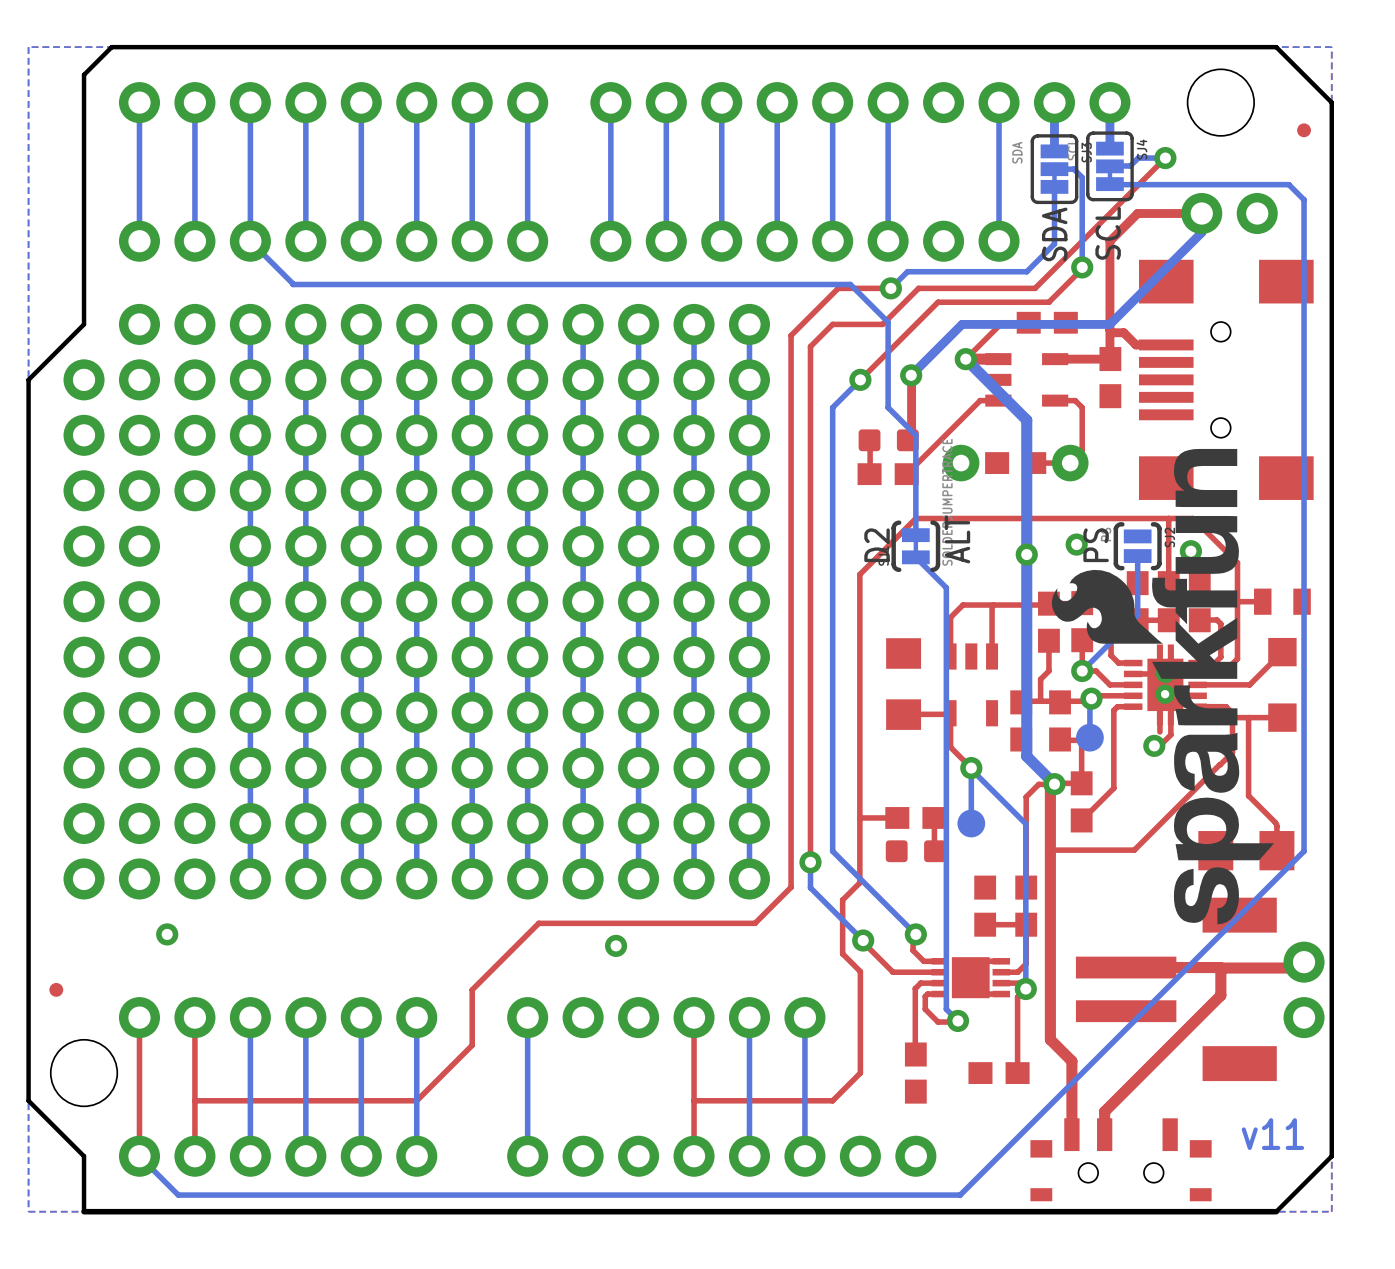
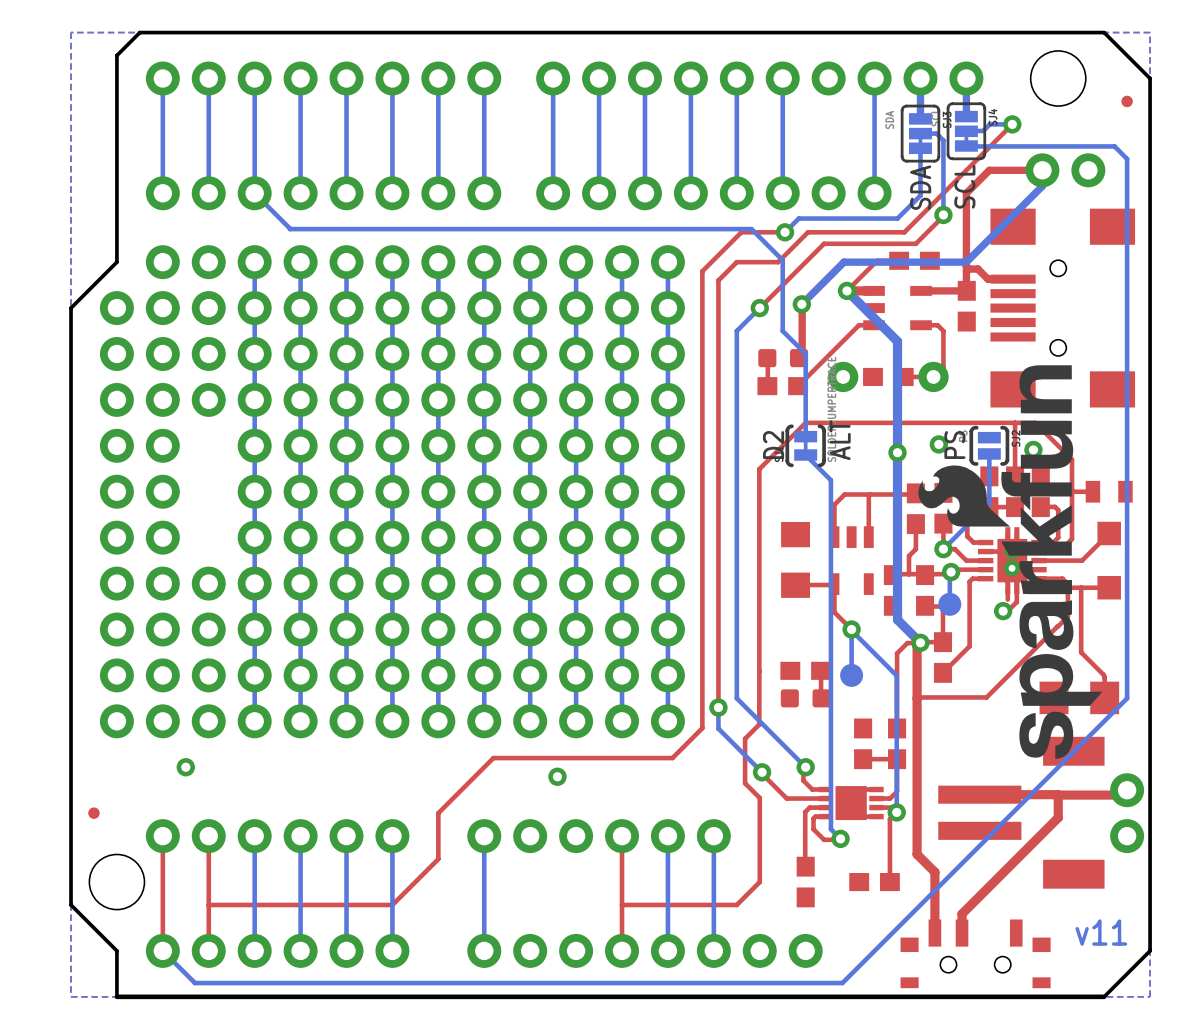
top track: (897, 817) (859, 817) -> none

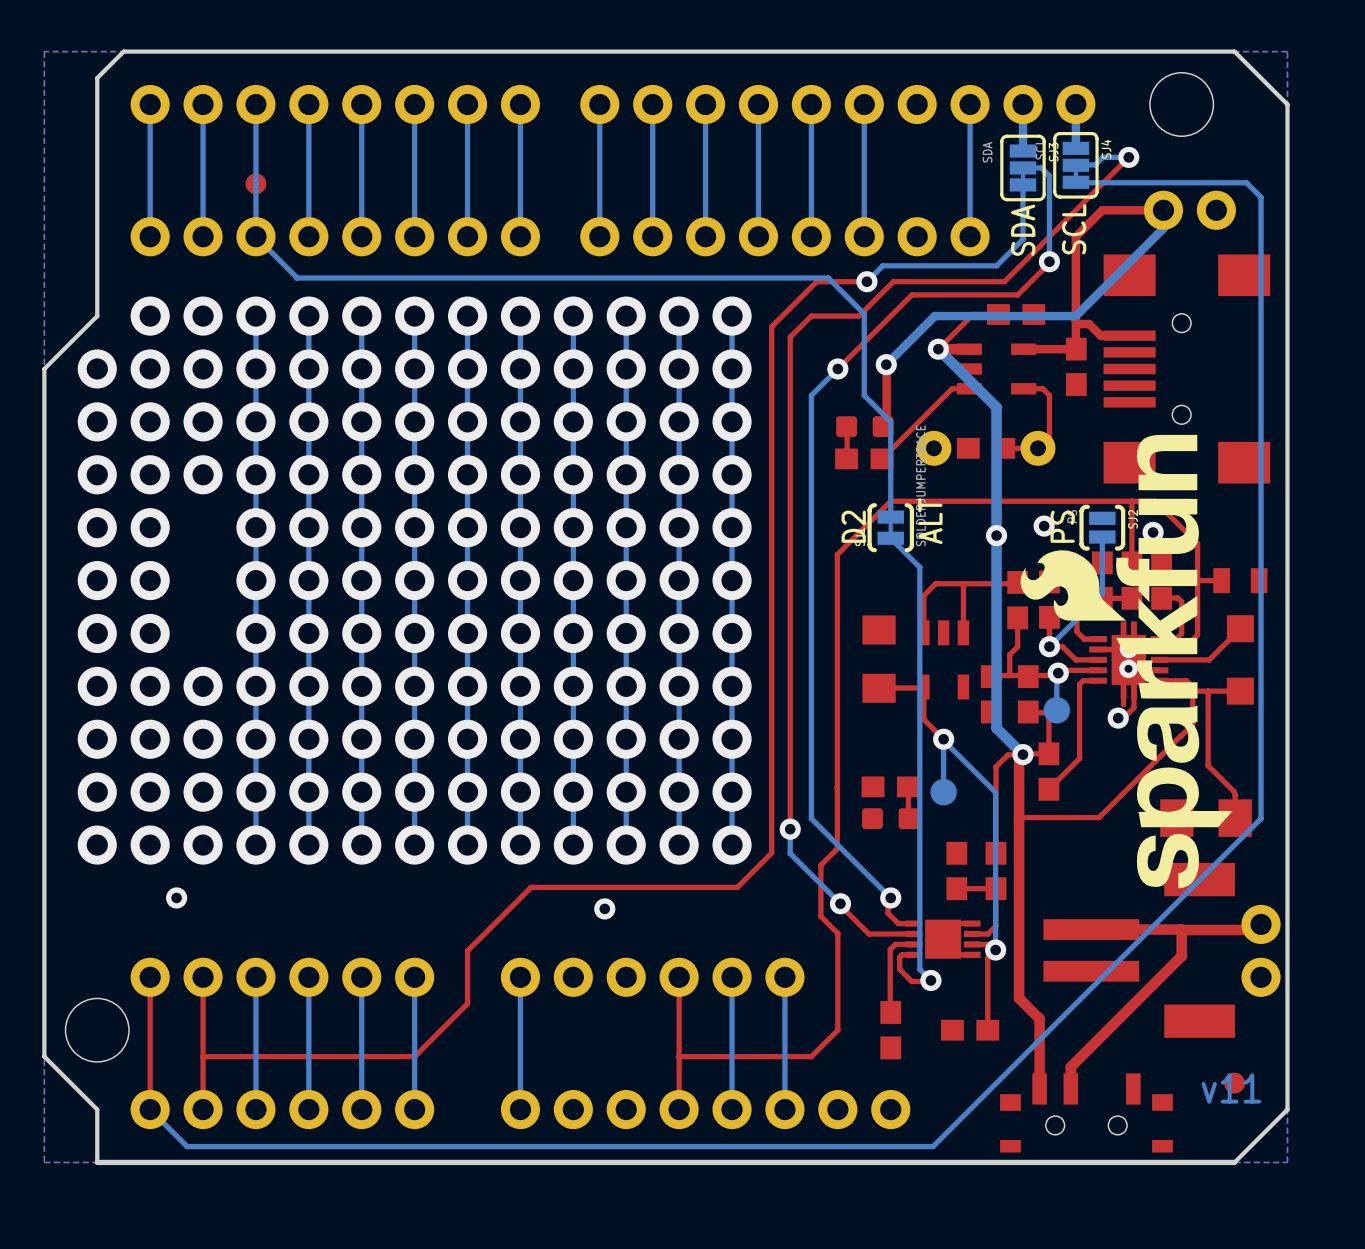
part: (1127, 101) -> none
part: none -> (255, 183)
part: (93, 813) -> none
part: none -> (1234, 1083)

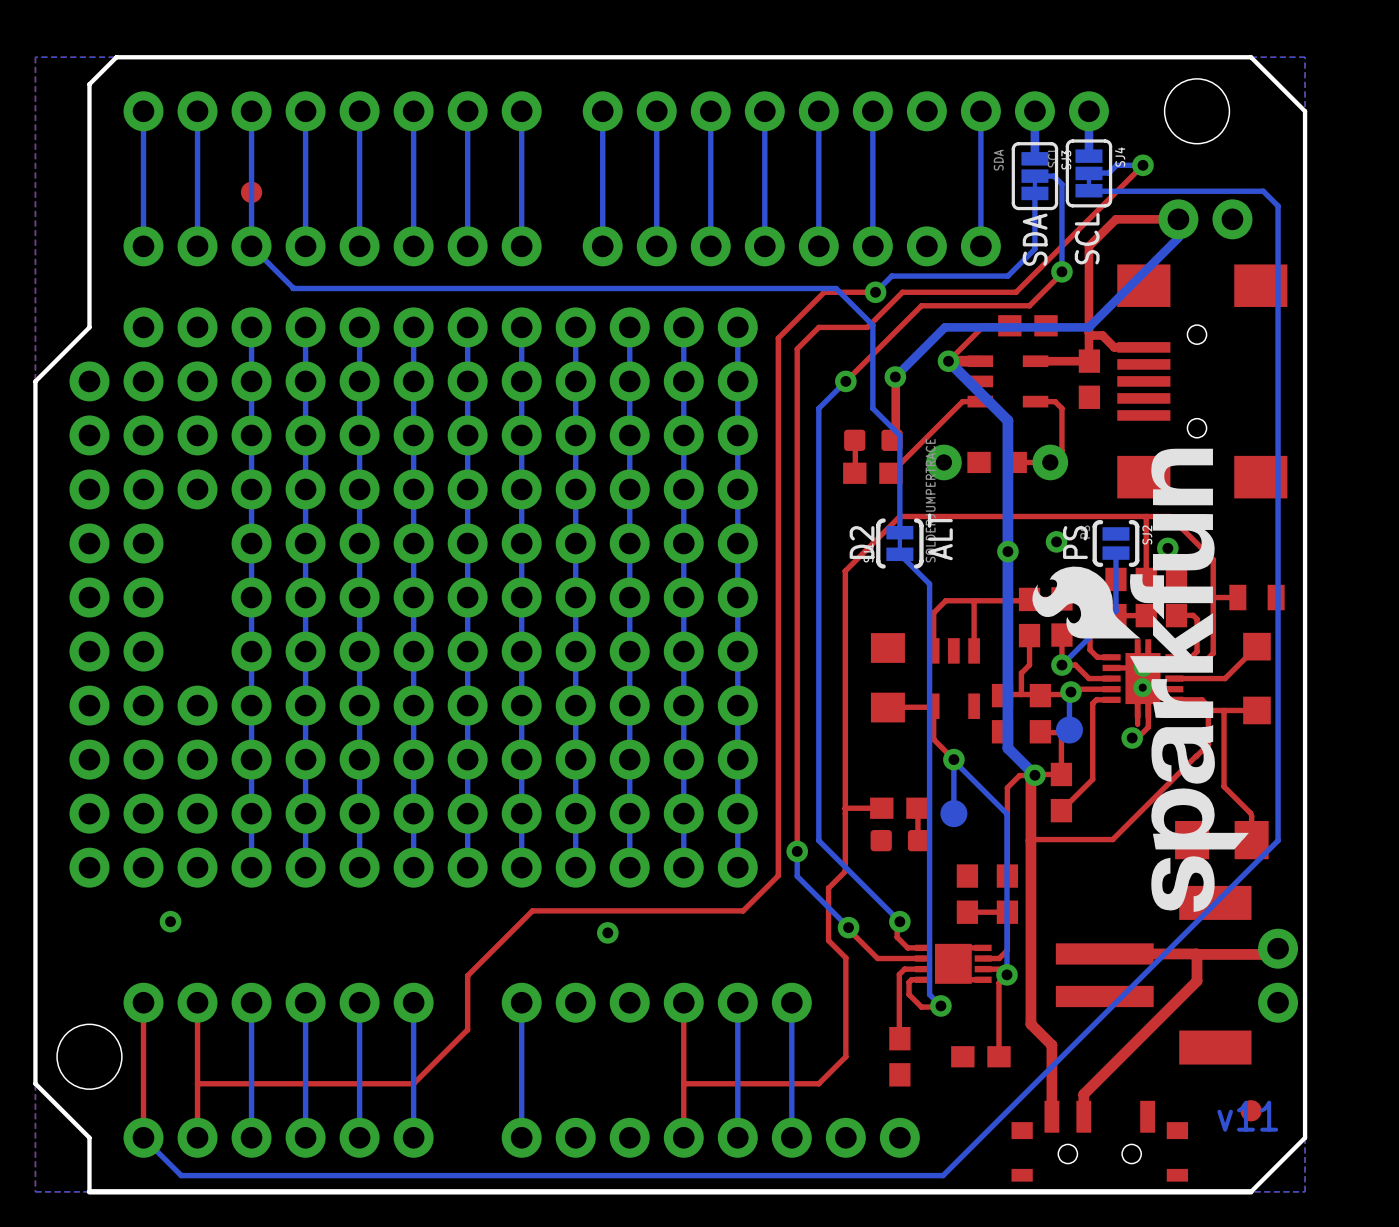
top track: none -> (881, 808) (845, 808)

